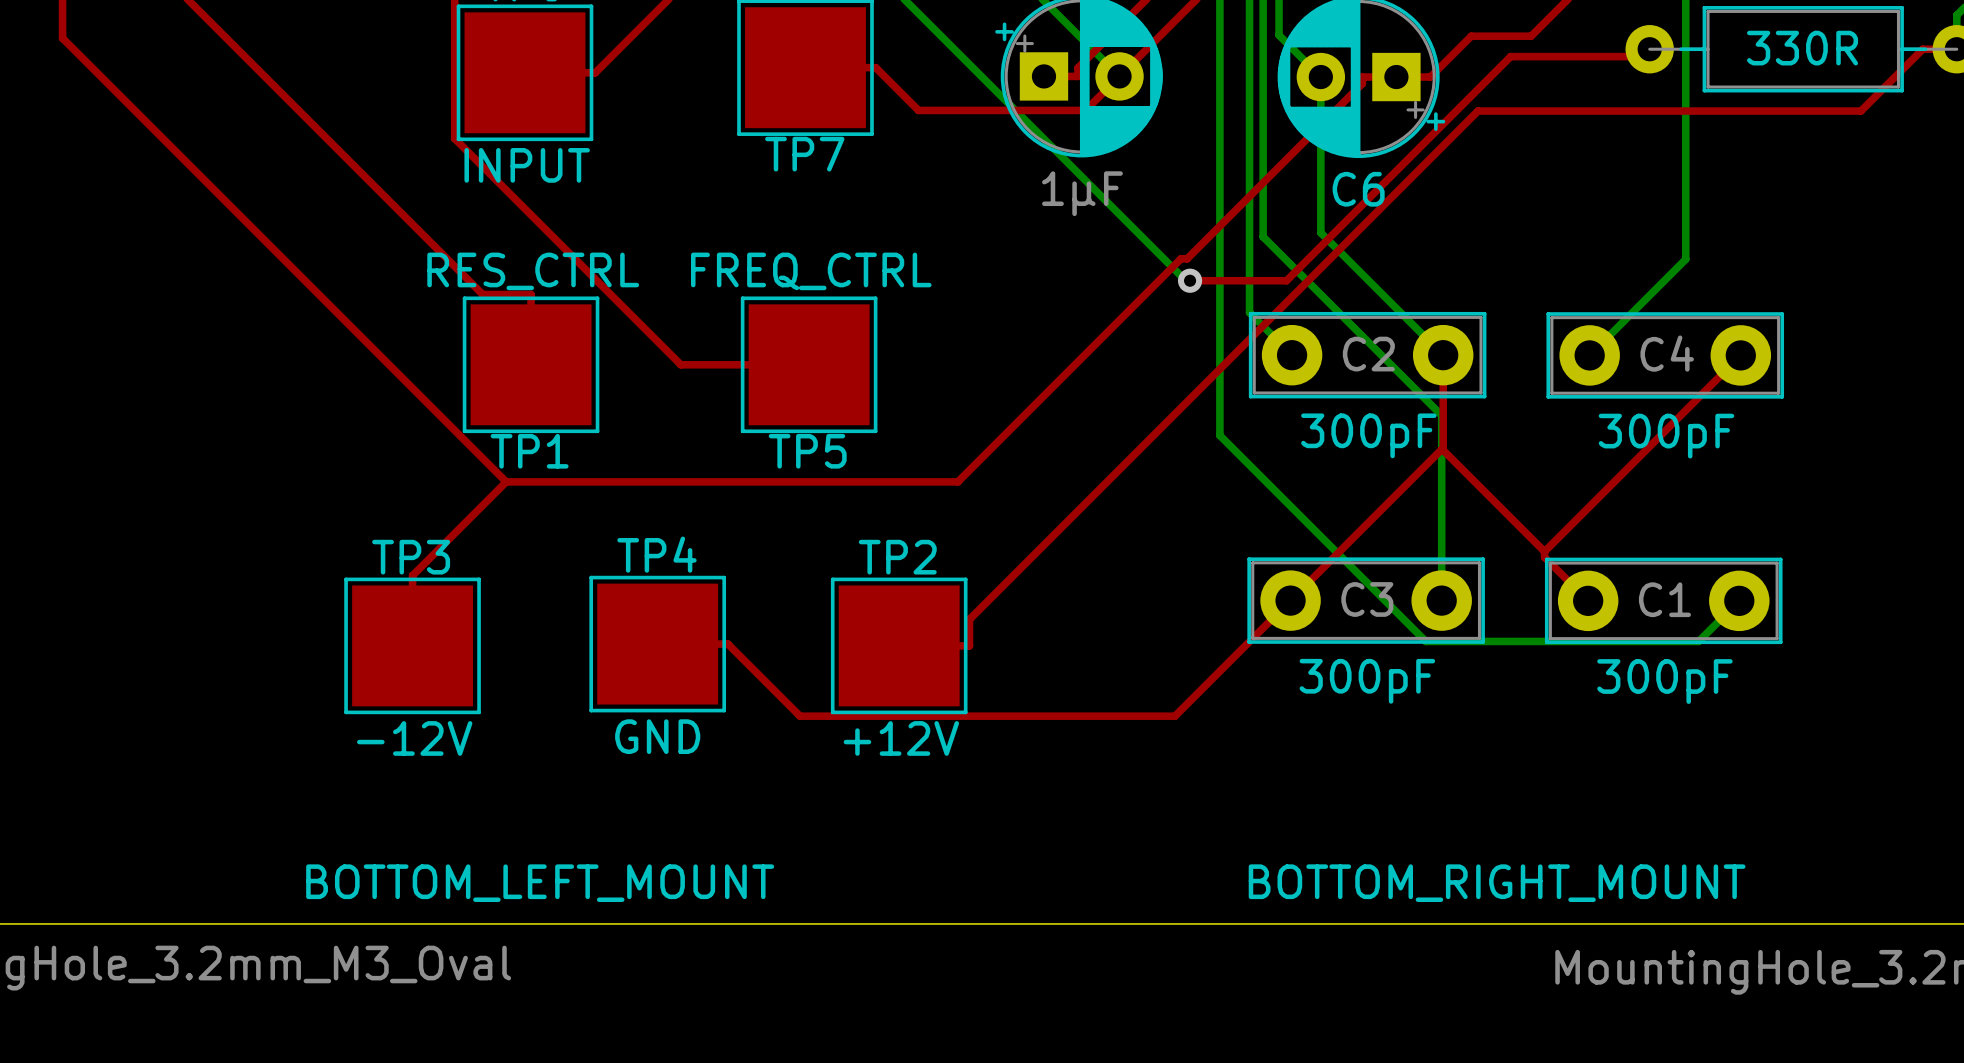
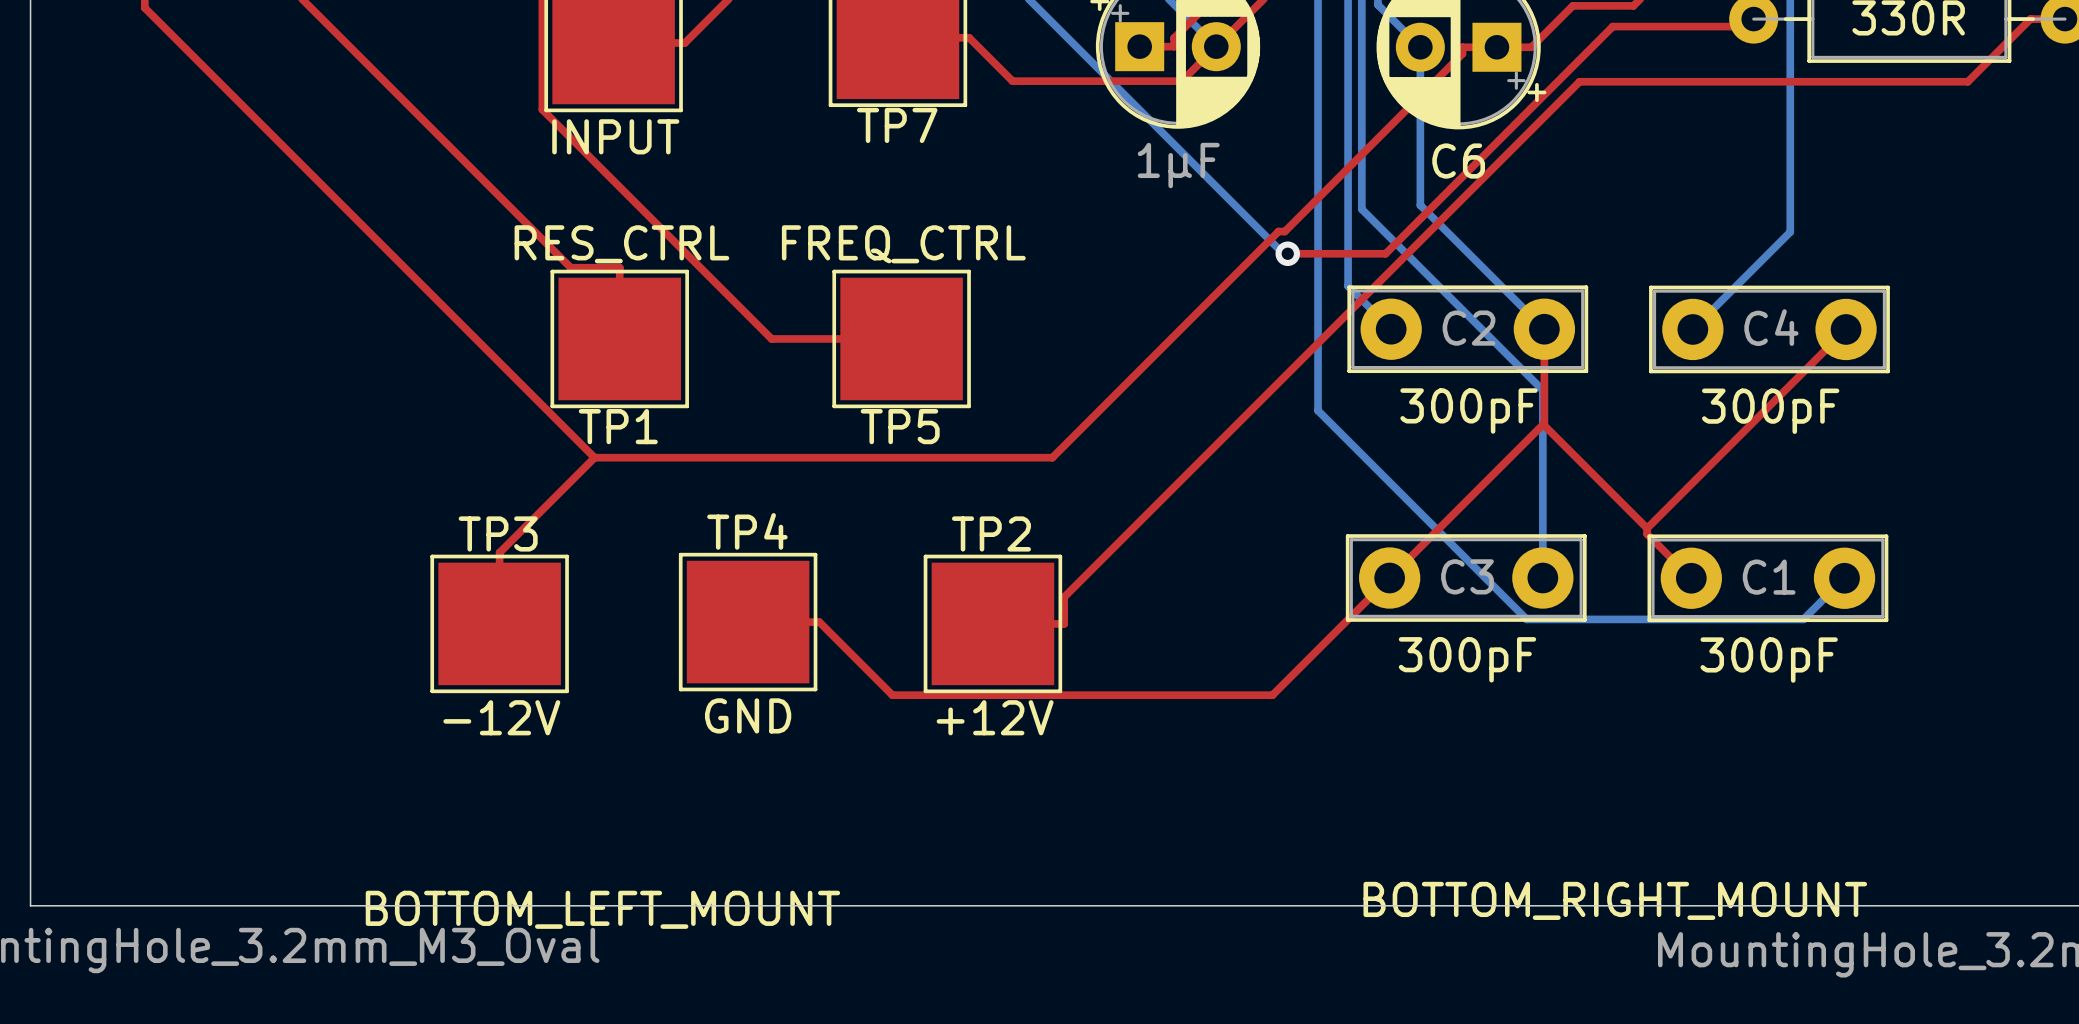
BOTTOM_LEFT_MOUNT name position: BOTTOM_LEFT_MOUNT (540, 883) -> BOTTOM_LEFT_MOUNT (602, 909)
BOTTOM_RIGHT_MOUNT name position: BOTTOM_RIGHT_MOUNT (1497, 883) -> BOTTOM_RIGHT_MOUNT (1615, 900)

